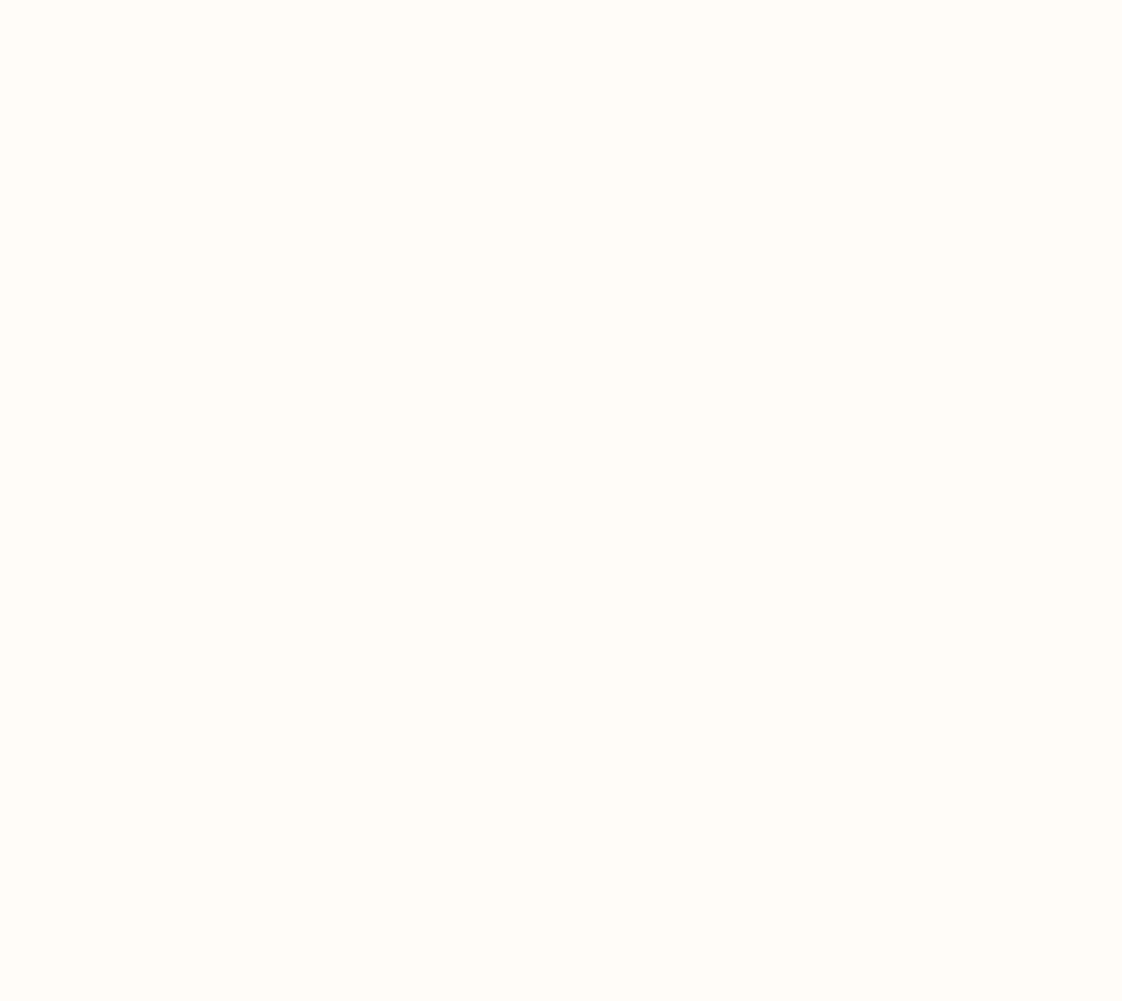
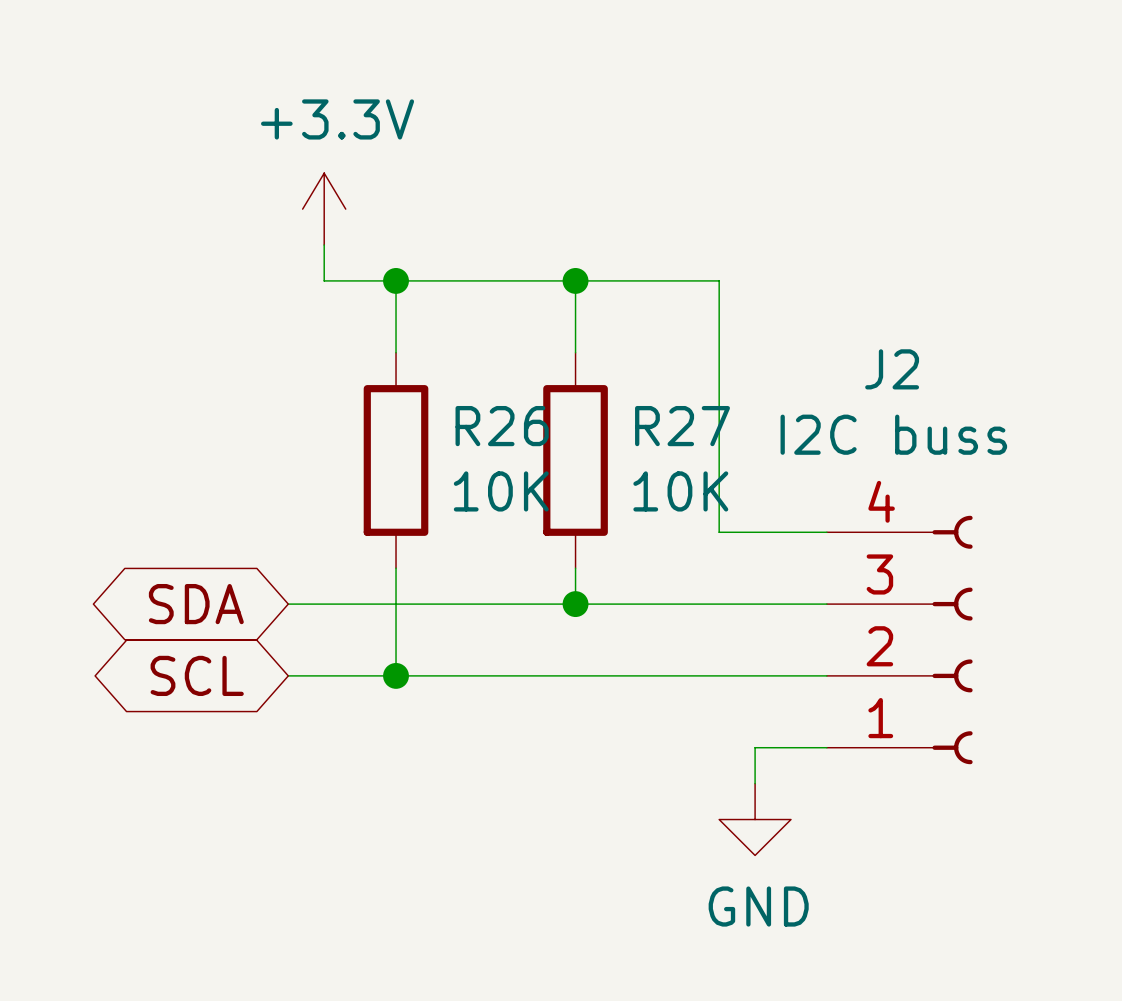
power symbol: none -> +3.3V (324, 209)
wire: none -> (324, 245) (324, 280) (719, 280) (719, 532) (826, 532)
wire: none -> (396, 280) (396, 352)
junction: none -> (396, 280)
wire: none -> (575, 280) (575, 352)
junction: none -> (575, 280)
R26: none -> 10K (396, 460)
R27: none -> 10K (575, 460)
wire: none -> (396, 568) (396, 675)
wire: none -> (575, 568) (575, 604)
global label: none -> SDA (196, 604)
wire: none -> (288, 604) (826, 604)
junction: none -> (575, 604)
J2: none -> I2C buss (899, 640)
global label: none -> SCL (197, 675)
wire: none -> (288, 675) (826, 675)
junction: none -> (396, 675)
wire: none -> (826, 747) (755, 747) (755, 783)
power symbol: none -> GND (755, 819)

